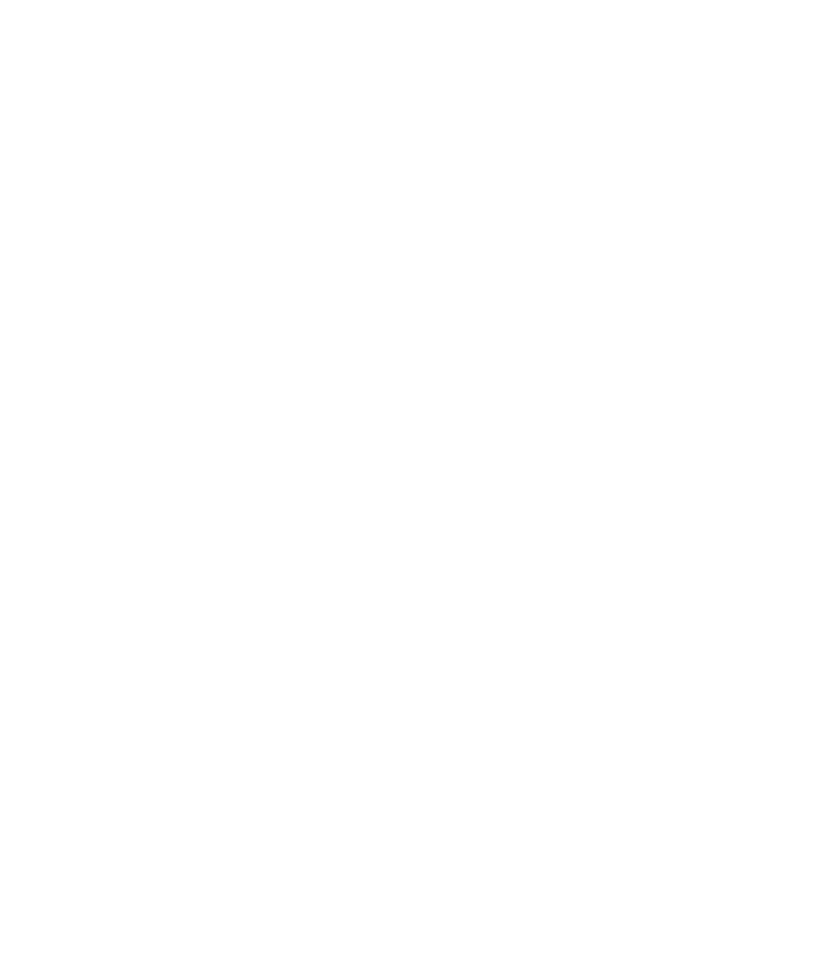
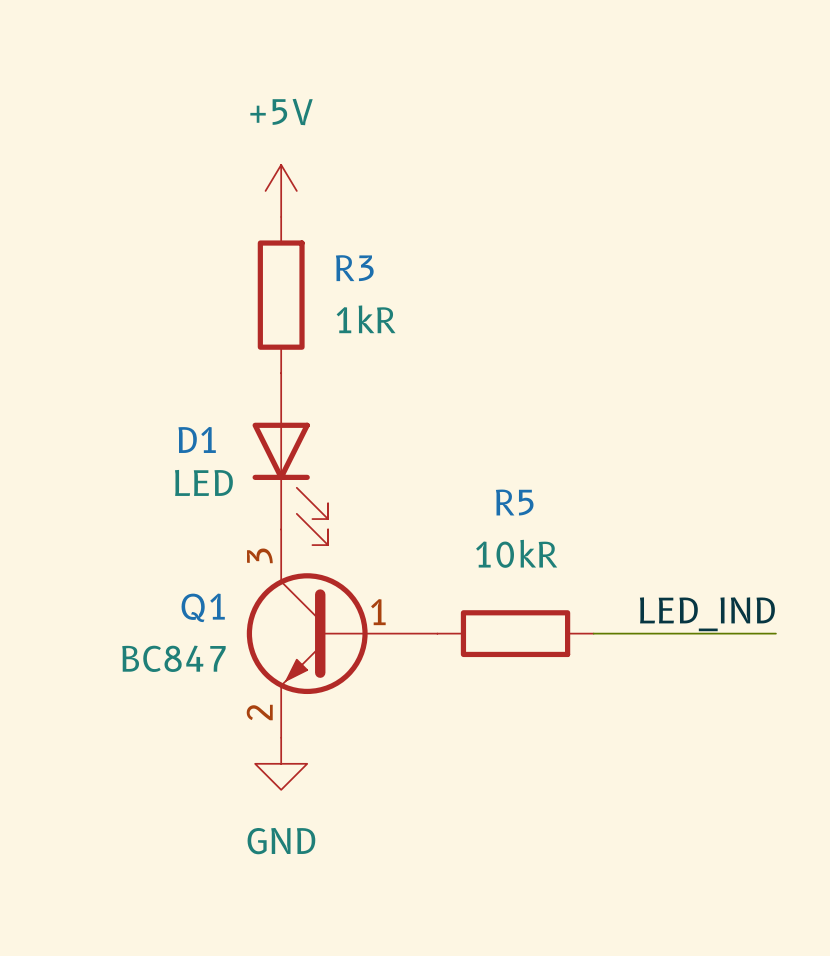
power symbol: none -> +5V (281, 190)
R3: none -> 1kR (281, 295)
D1: none -> LED (290, 459)
label: none -> LED_IND (707, 614)
Q1: none -> BC847 (342, 633)
R5: none -> 10kR (515, 633)
wire: none -> (593, 633) (775, 633)
power symbol: none -> GND (281, 763)

